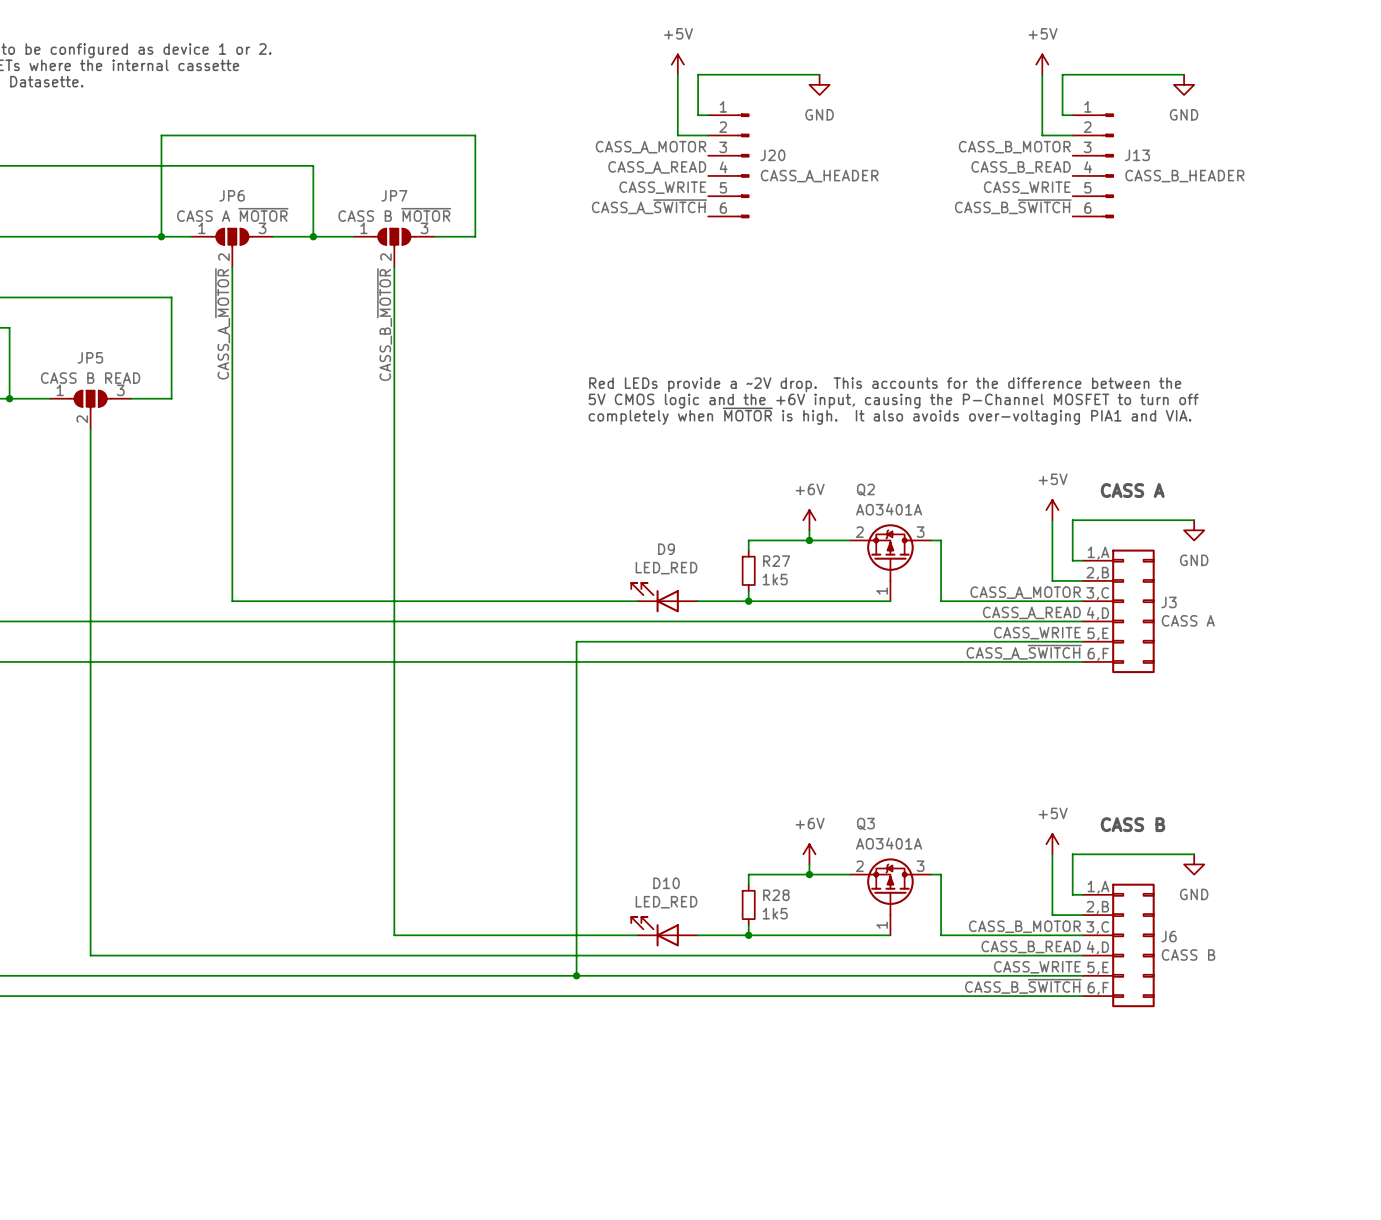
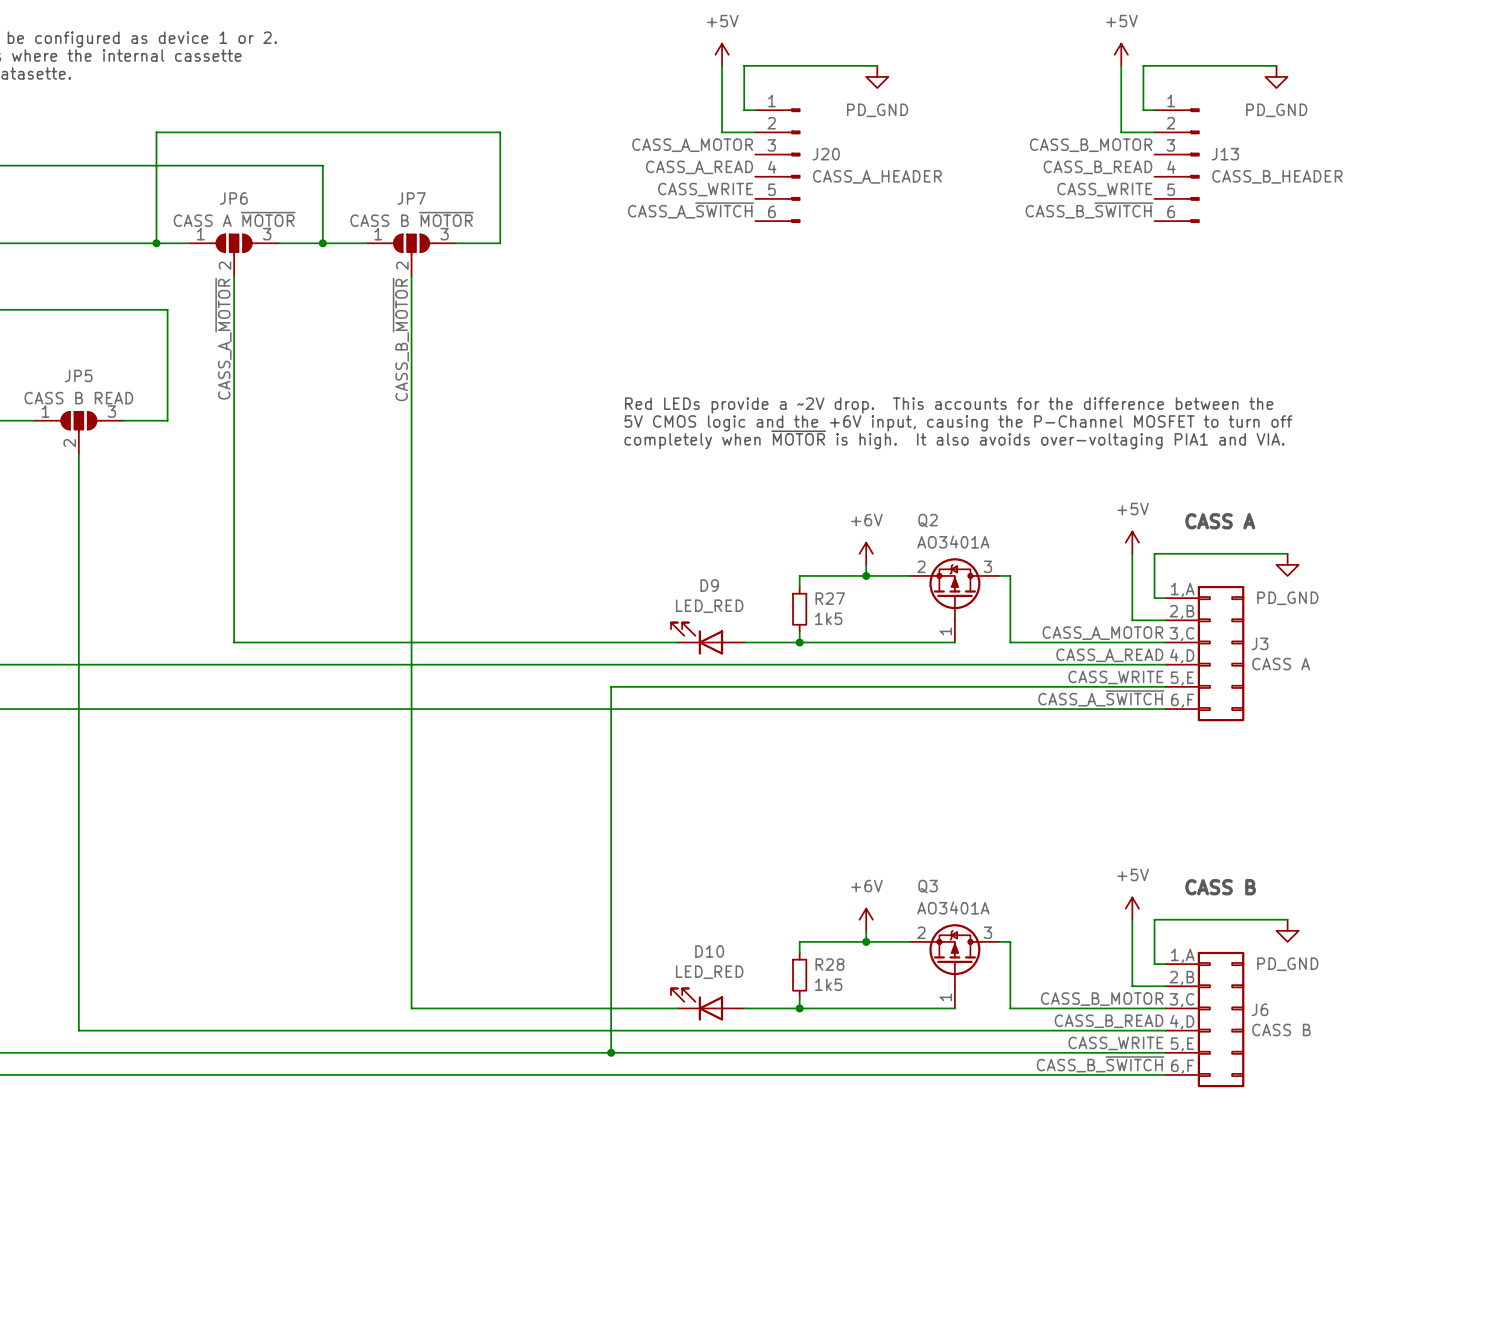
power symbol: GND (819, 84) -> PD_GND (877, 76)
power symbol: GND (1184, 84) -> PD_GND (1276, 76)
power symbol: GND (1194, 530) -> PD_GND (1287, 564)
power symbol: GND (1194, 864) -> PD_GND (1287, 930)

